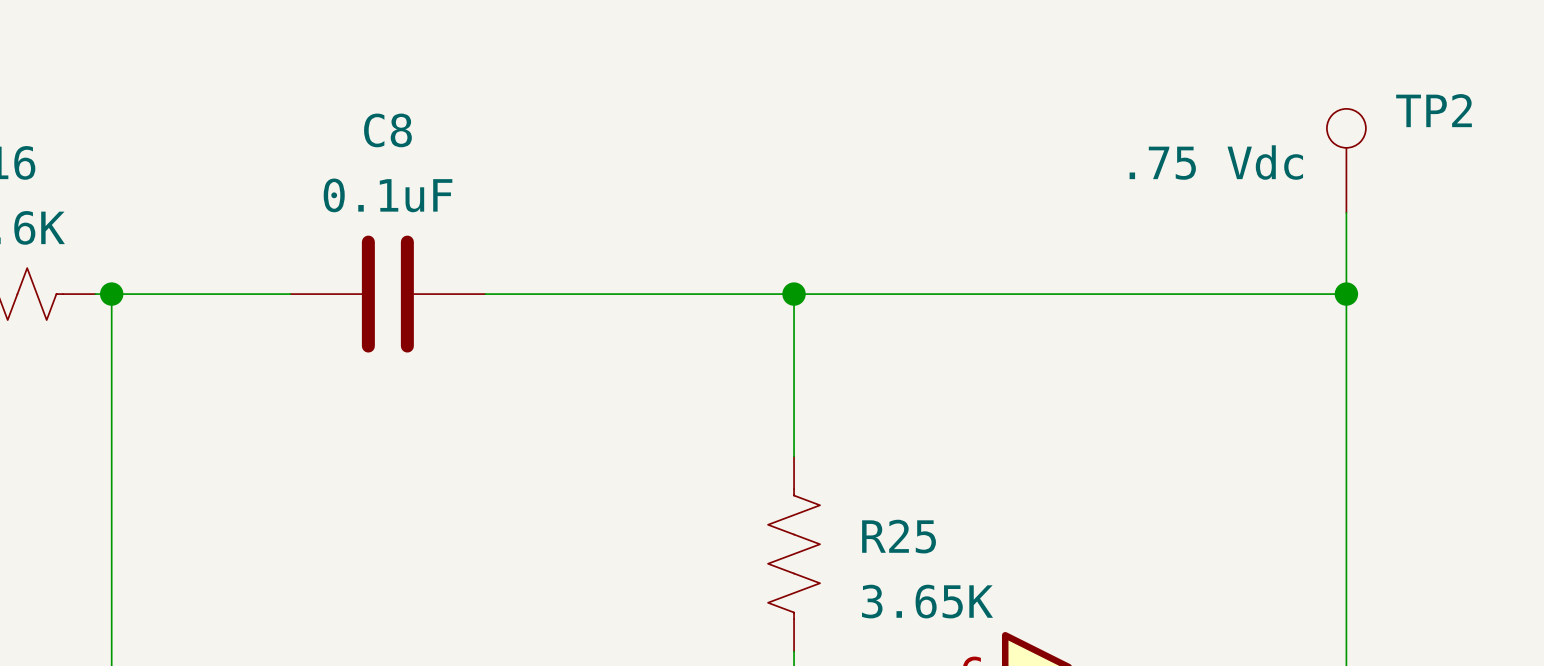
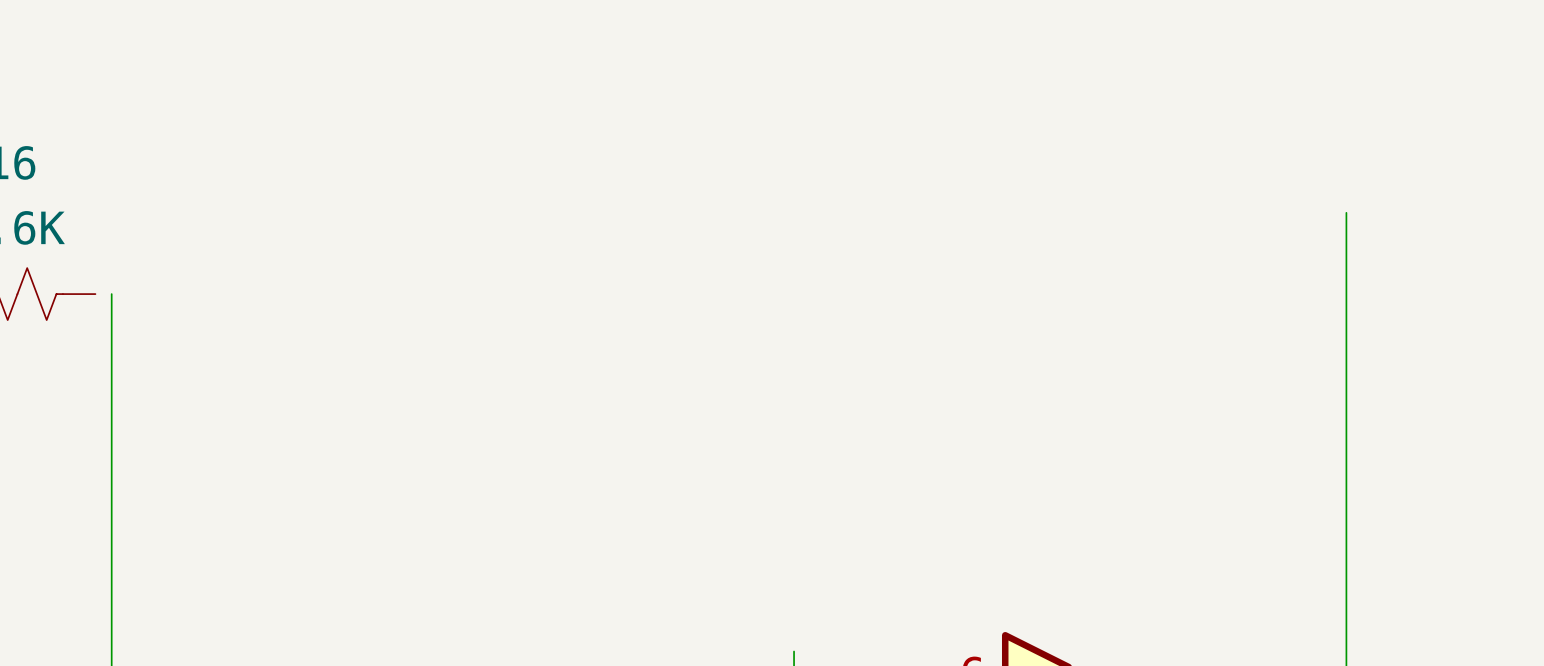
TP2: .75 Vdc (1346, 160) -> none
wire: (95, 294) (290, 294) -> none
junction: (111, 294) -> none
C8: 0.1uF (387, 294) -> none
wire: (485, 294) (1346, 294) -> none
wire: (794, 294) (794, 456) -> none
junction: (794, 294) -> none
junction: (1346, 294) -> none
R25: 3.65K (794, 554) -> none

